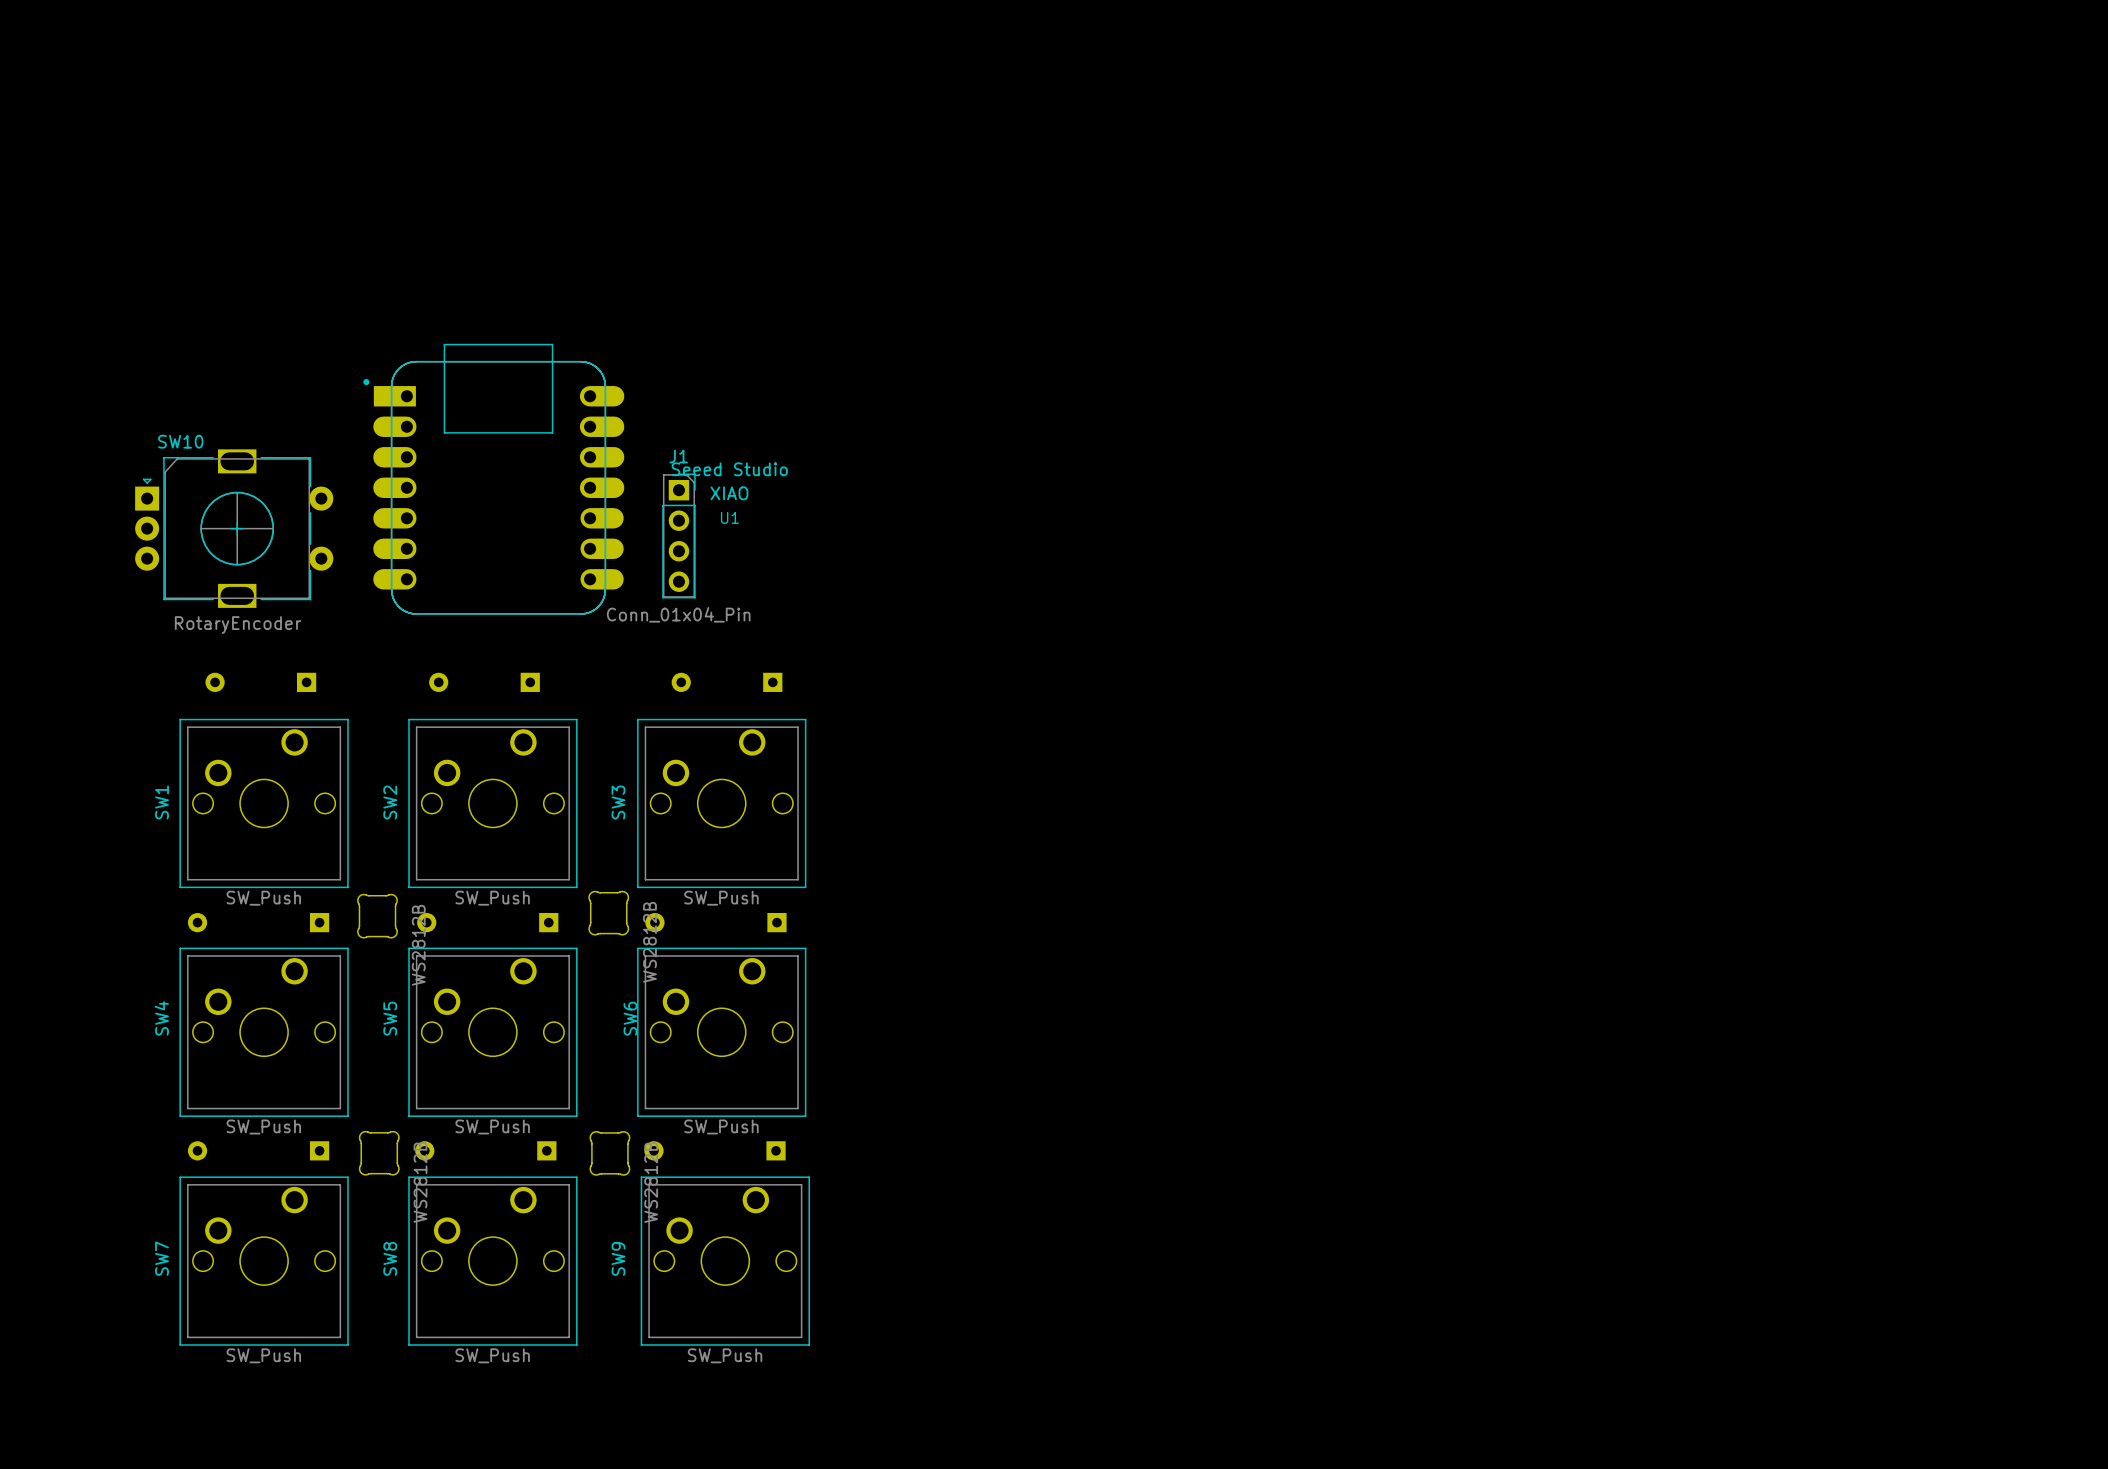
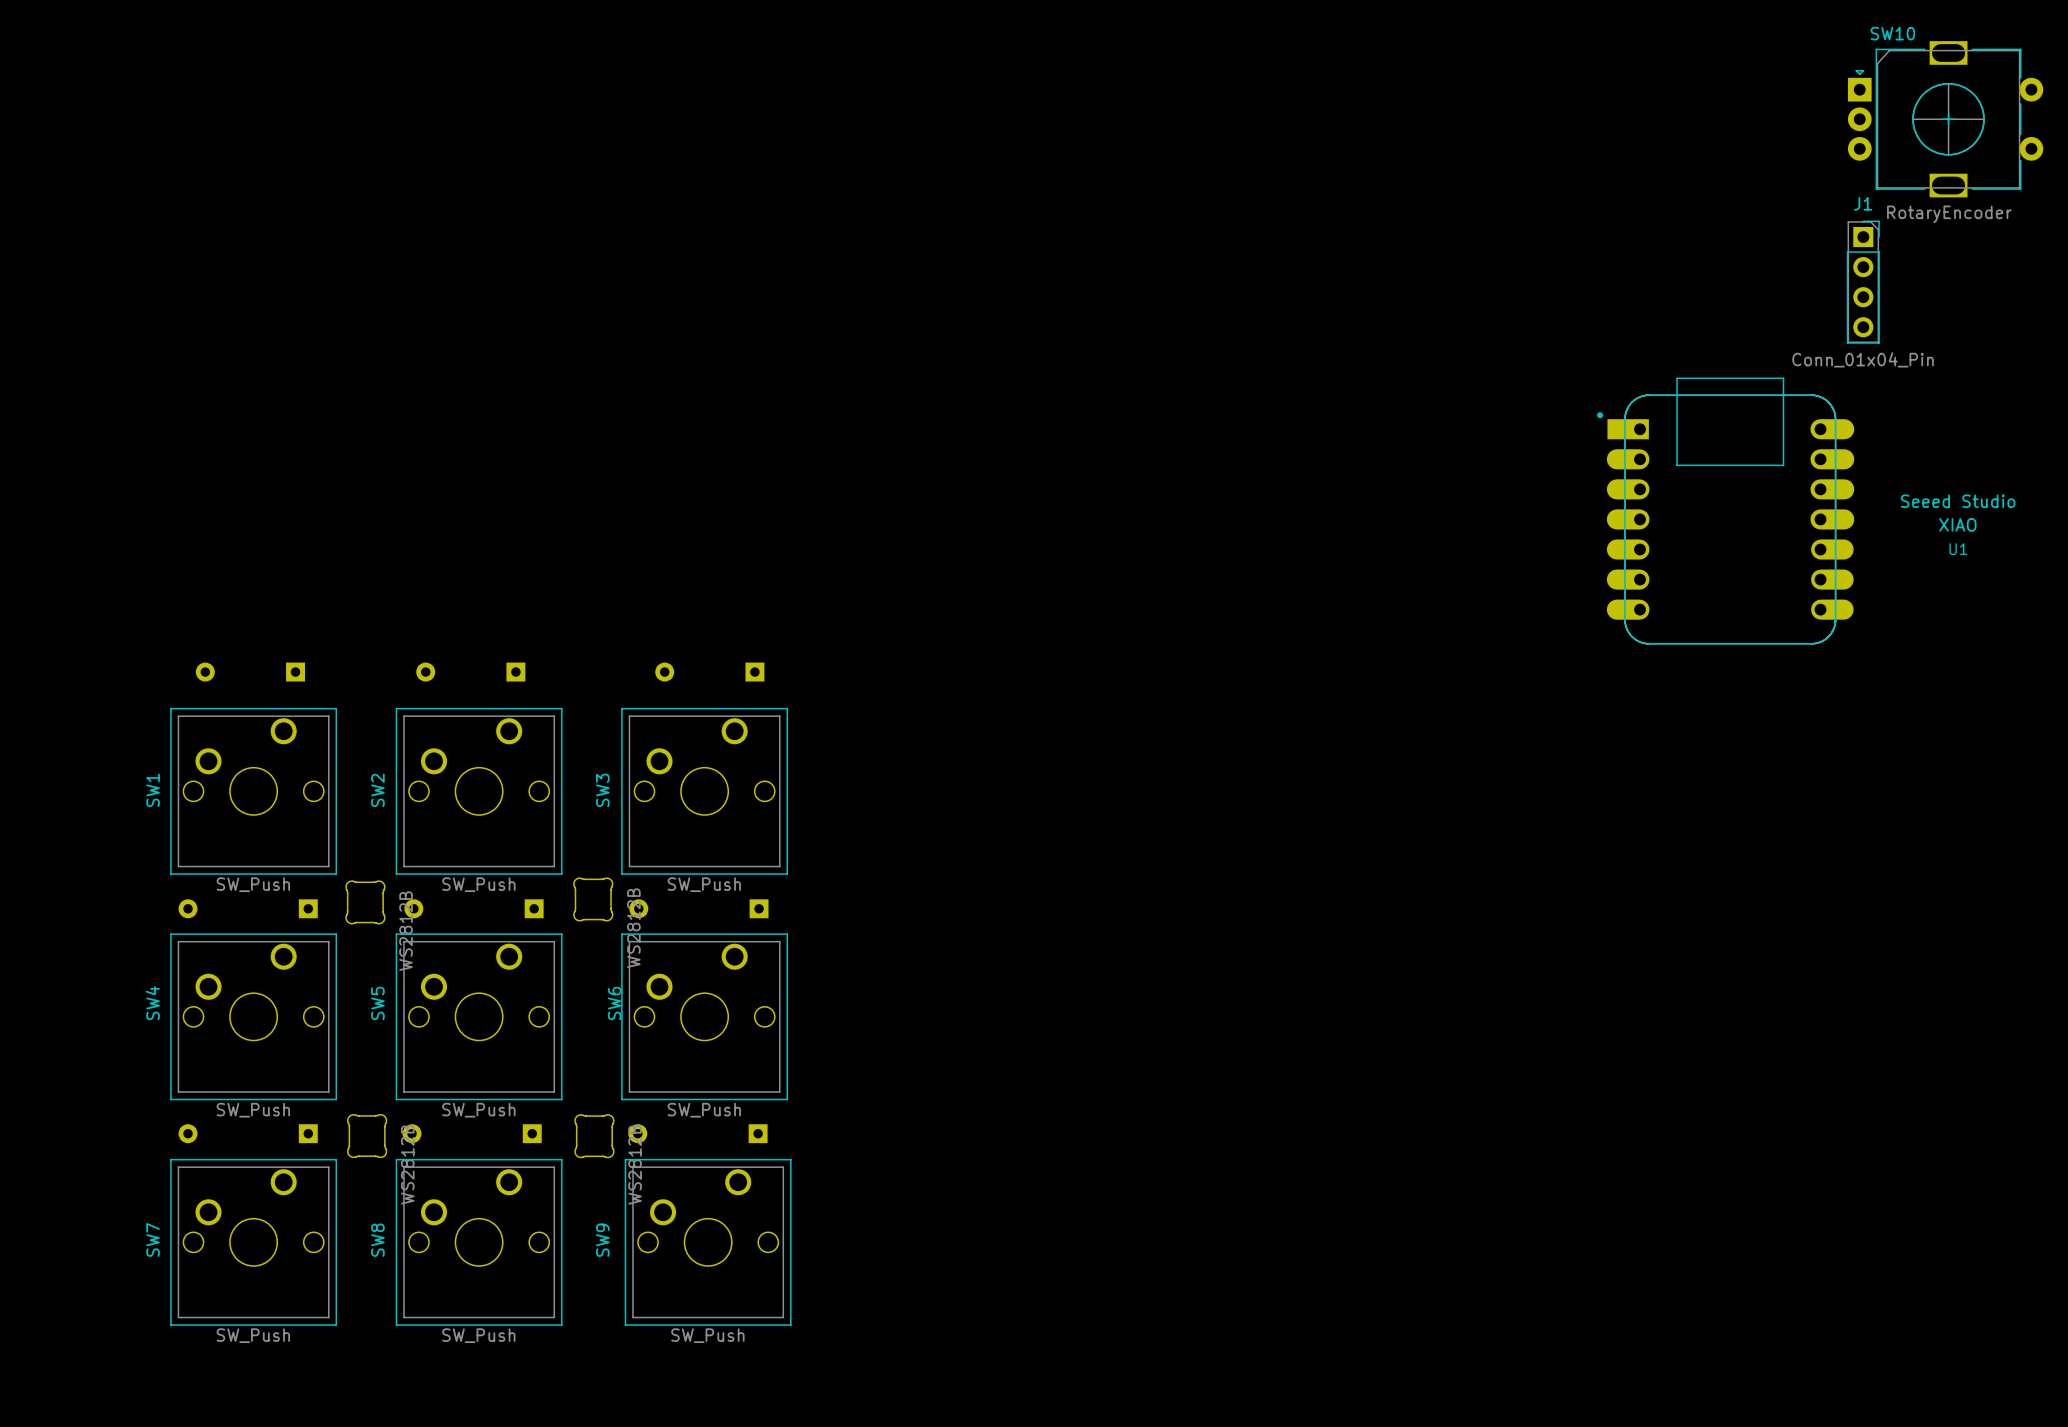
U1 footprint: [363, 343, 625, 615] -> [1597, 377, 1855, 645]
SW10 position: (234, 528) -> (1945, 119)
J1 position: (678, 535) -> (1863, 282)

